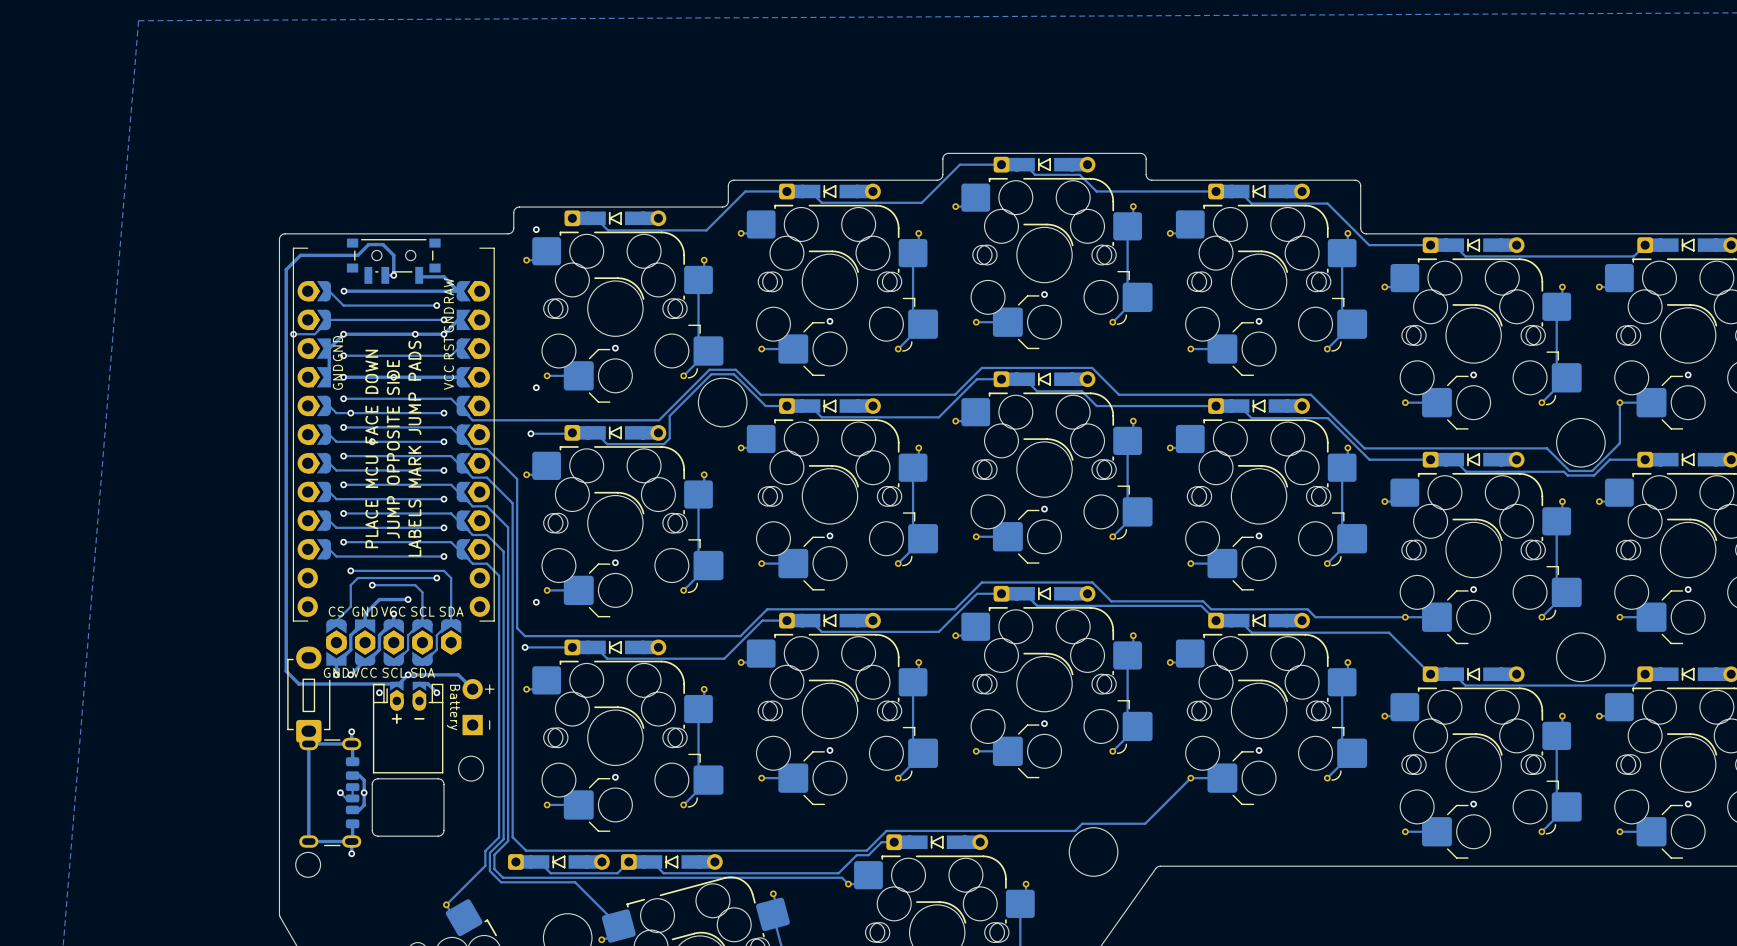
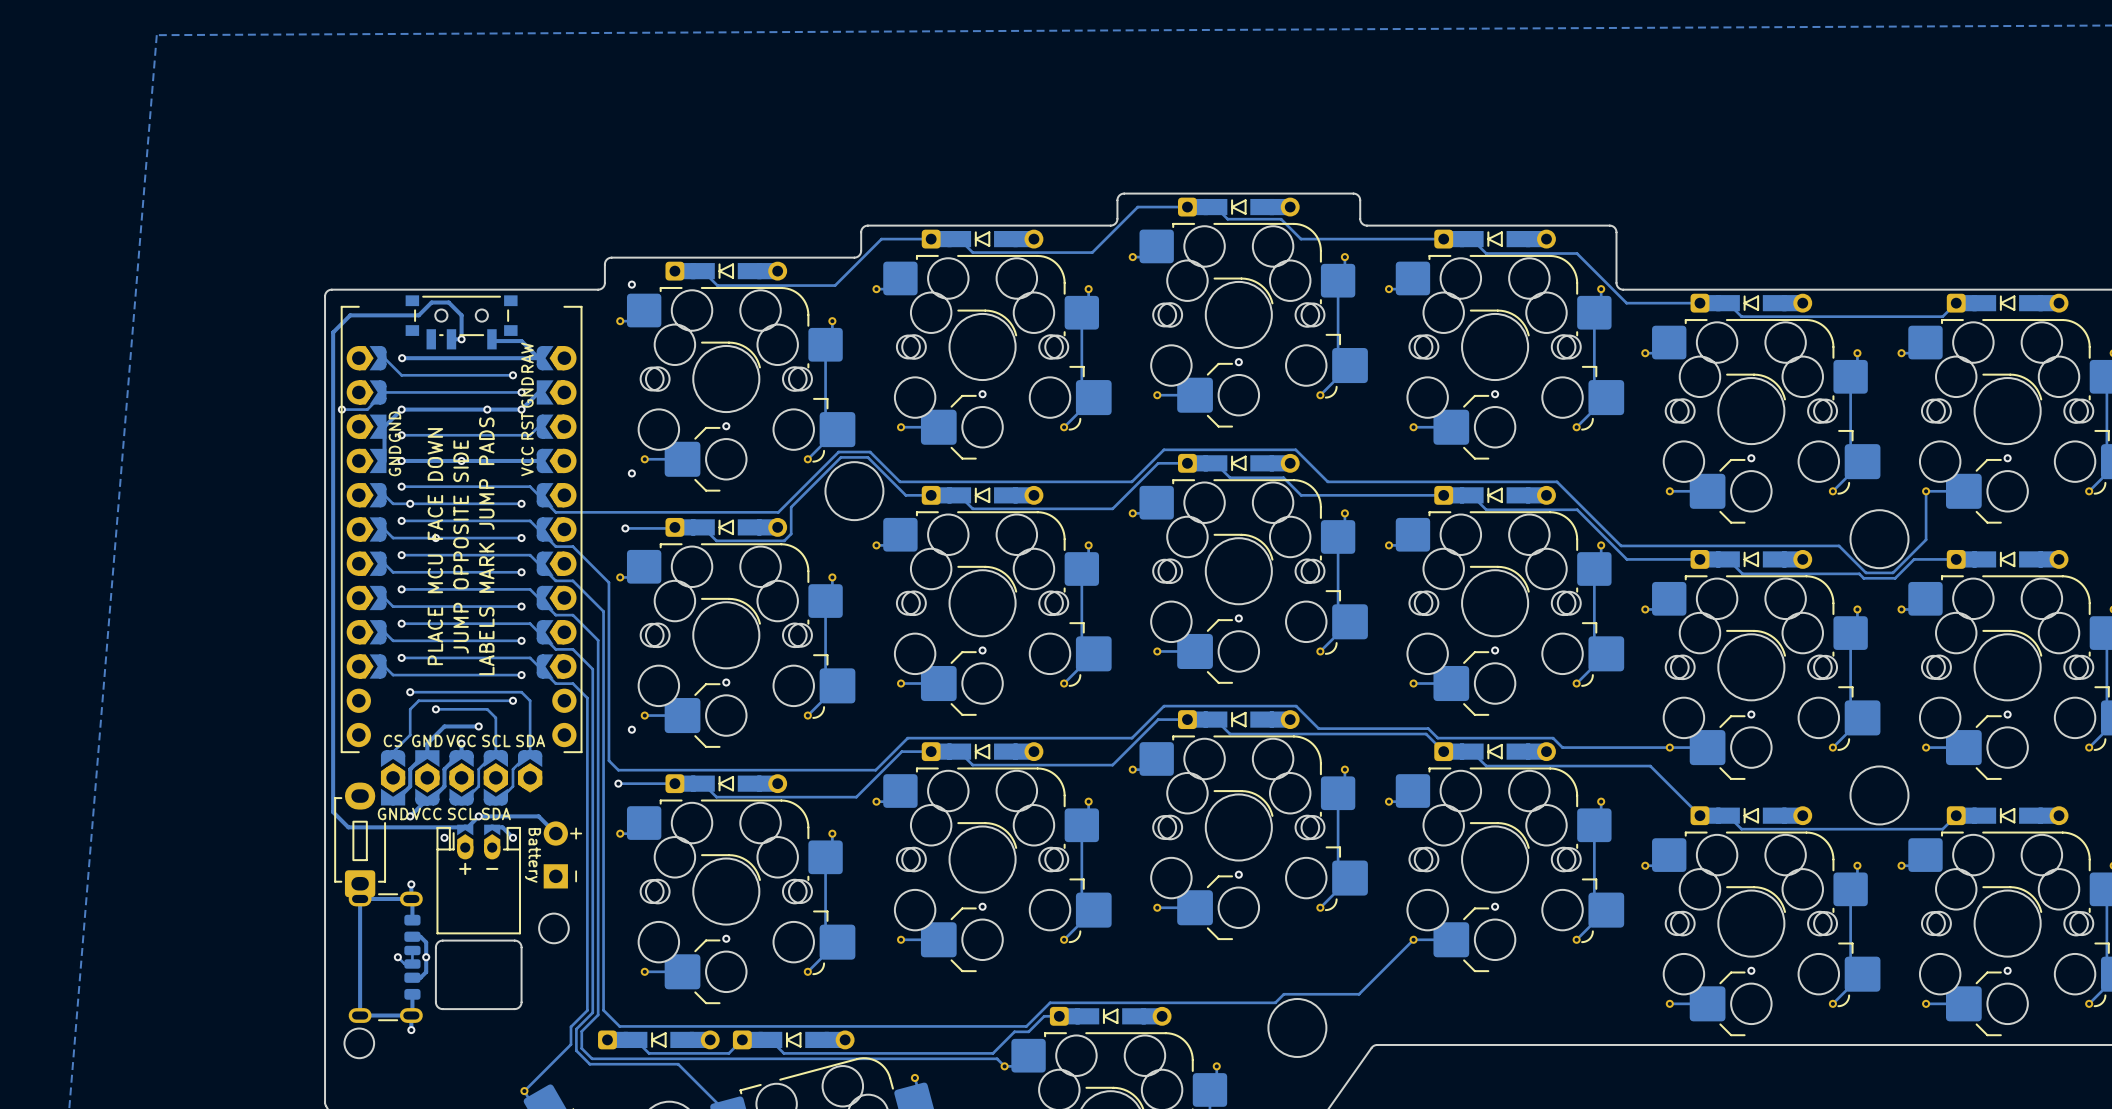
track: (336, 664) (336, 674) -> none
via: (336, 674) -> none

